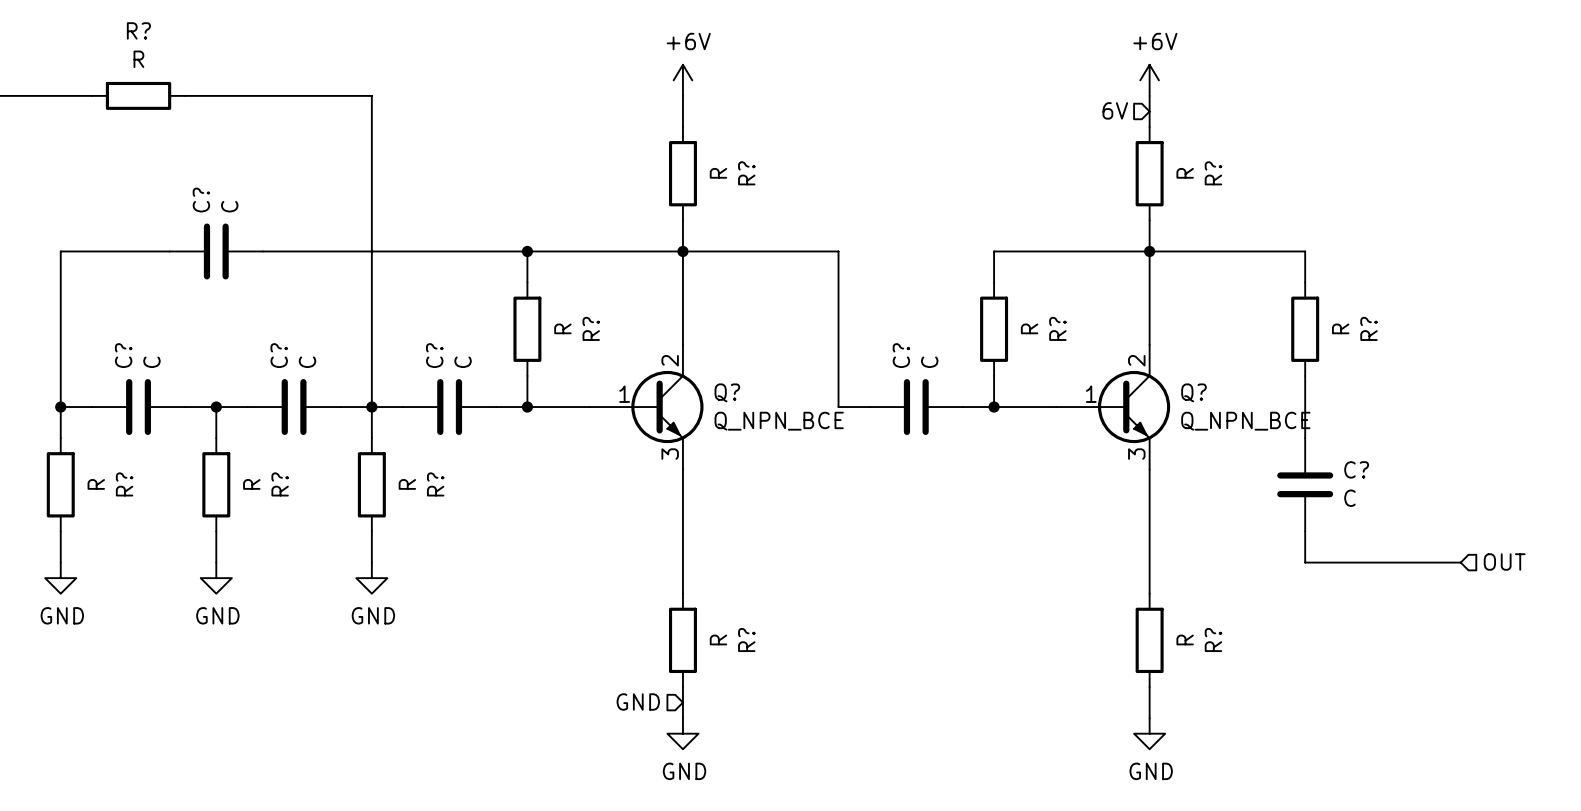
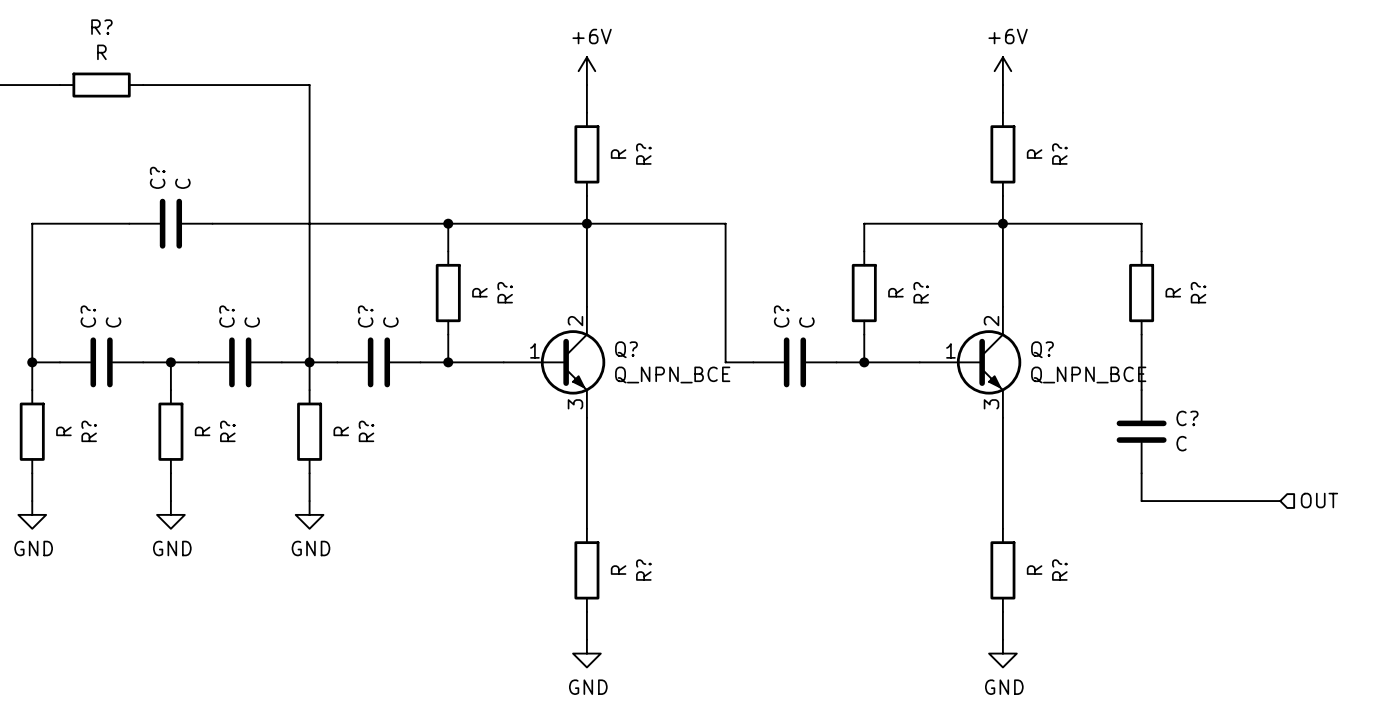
hierarchical label: 6V (1115, 110) -> none
hierarchical label: GND (638, 702) -> none

